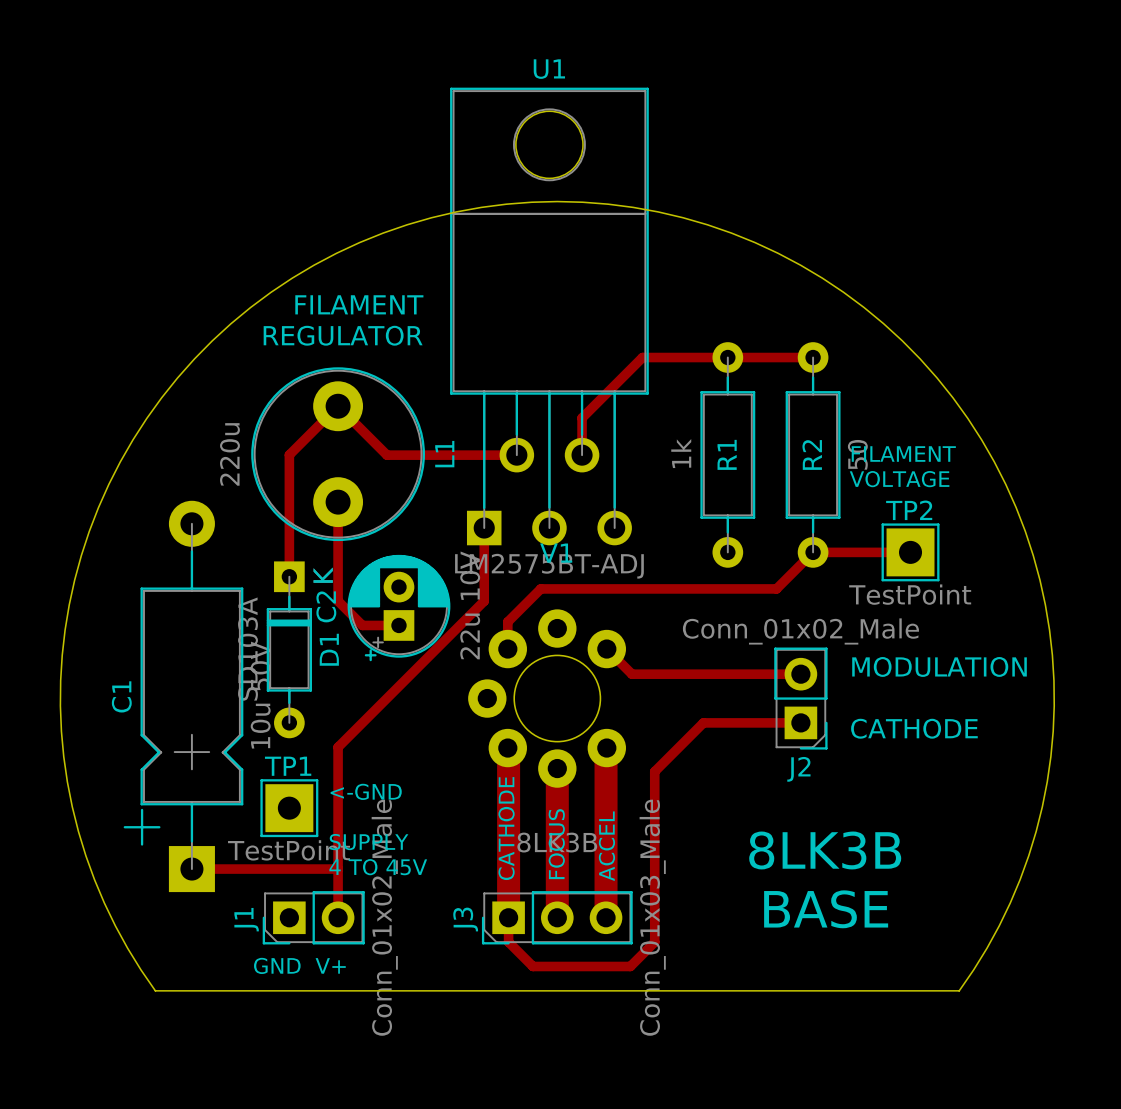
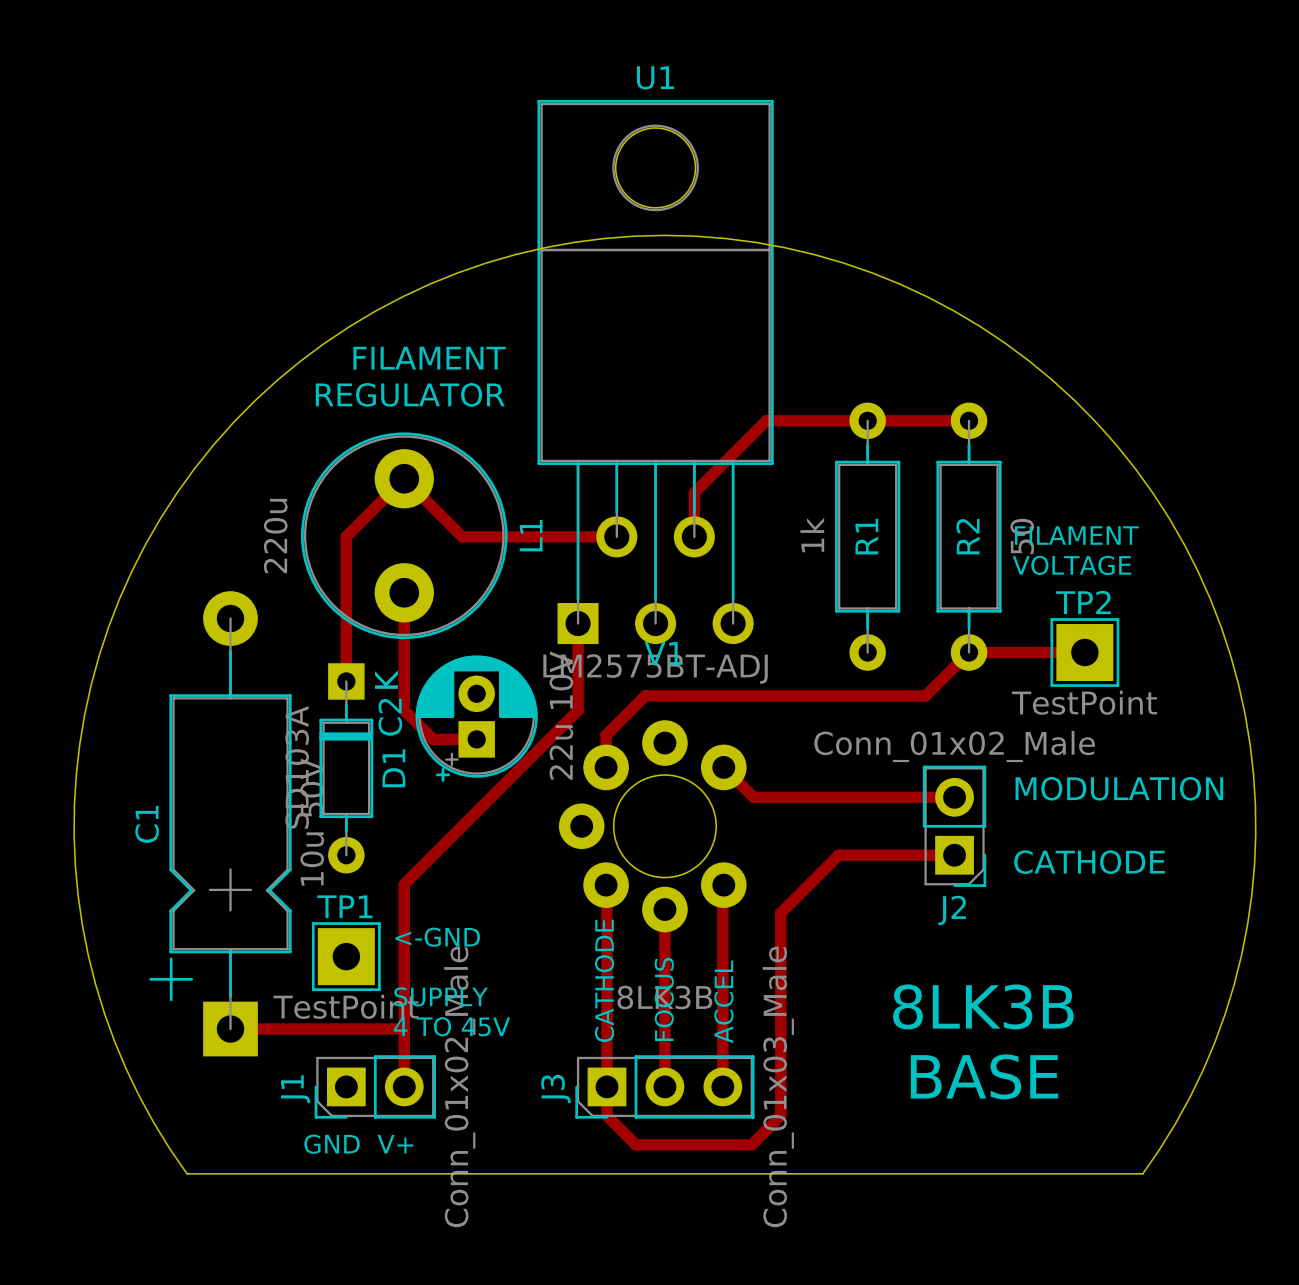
track width: thick (507, 748) (508, 917) -> thin (606, 885) (607, 1086)
track width: thick (606, 748) (606, 917) -> thin (723, 885) (722, 1086)
track width: thick (557, 768) (557, 917) -> thin (664, 909) (664, 1086)

